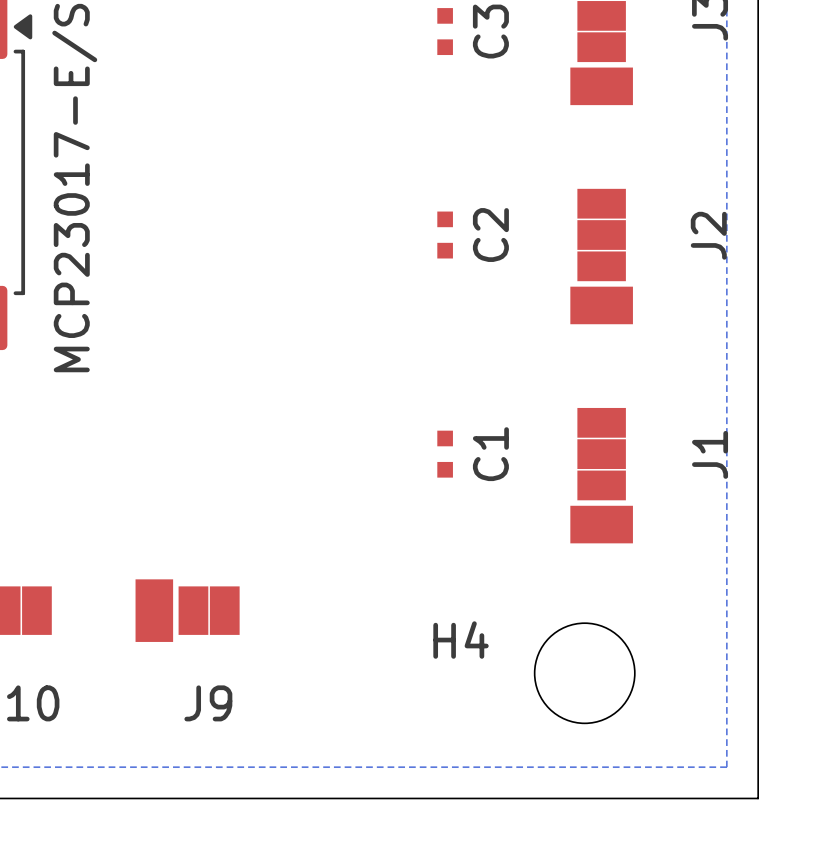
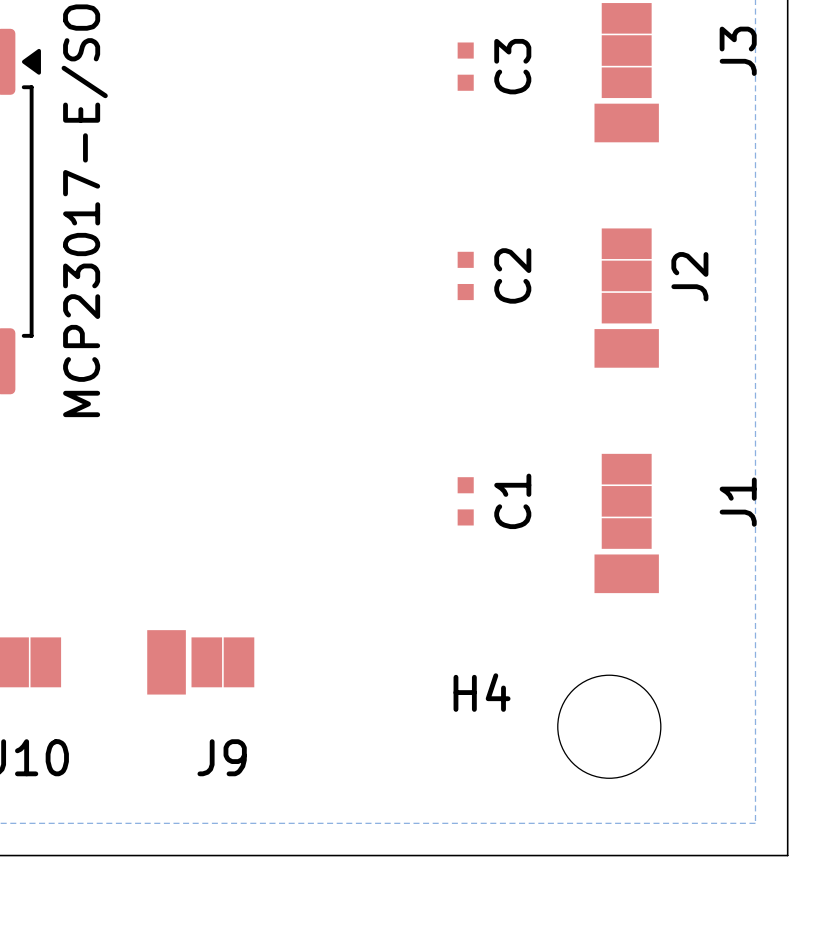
J2 name position: J2 (708, 235) -> J2 (689, 276)

